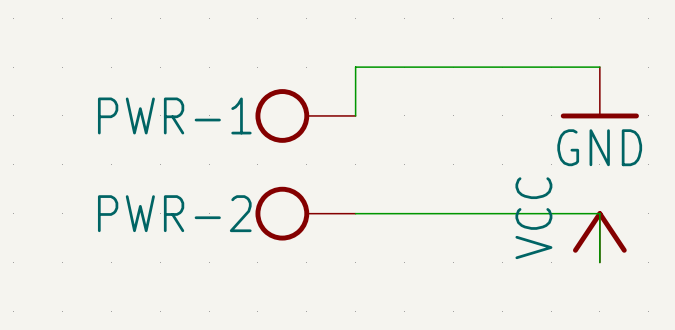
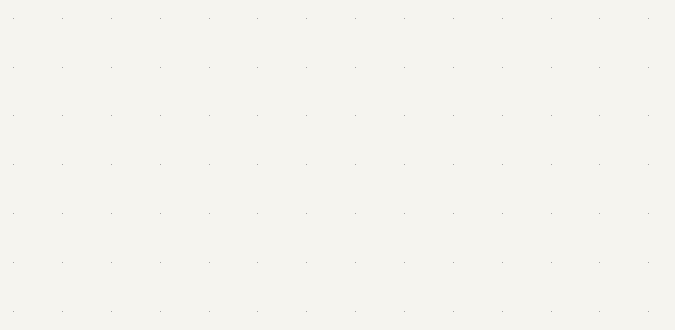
wire: (599, 67) (355, 67) (355, 115) -> none
power symbol: GND (599, 92) -> none
PWR-1: (305, 115) -> none
PWR-2: (305, 213) -> none
wire: (355, 213) (599, 213) (599, 262) -> none
power symbol: VCC (599, 236) -> none

